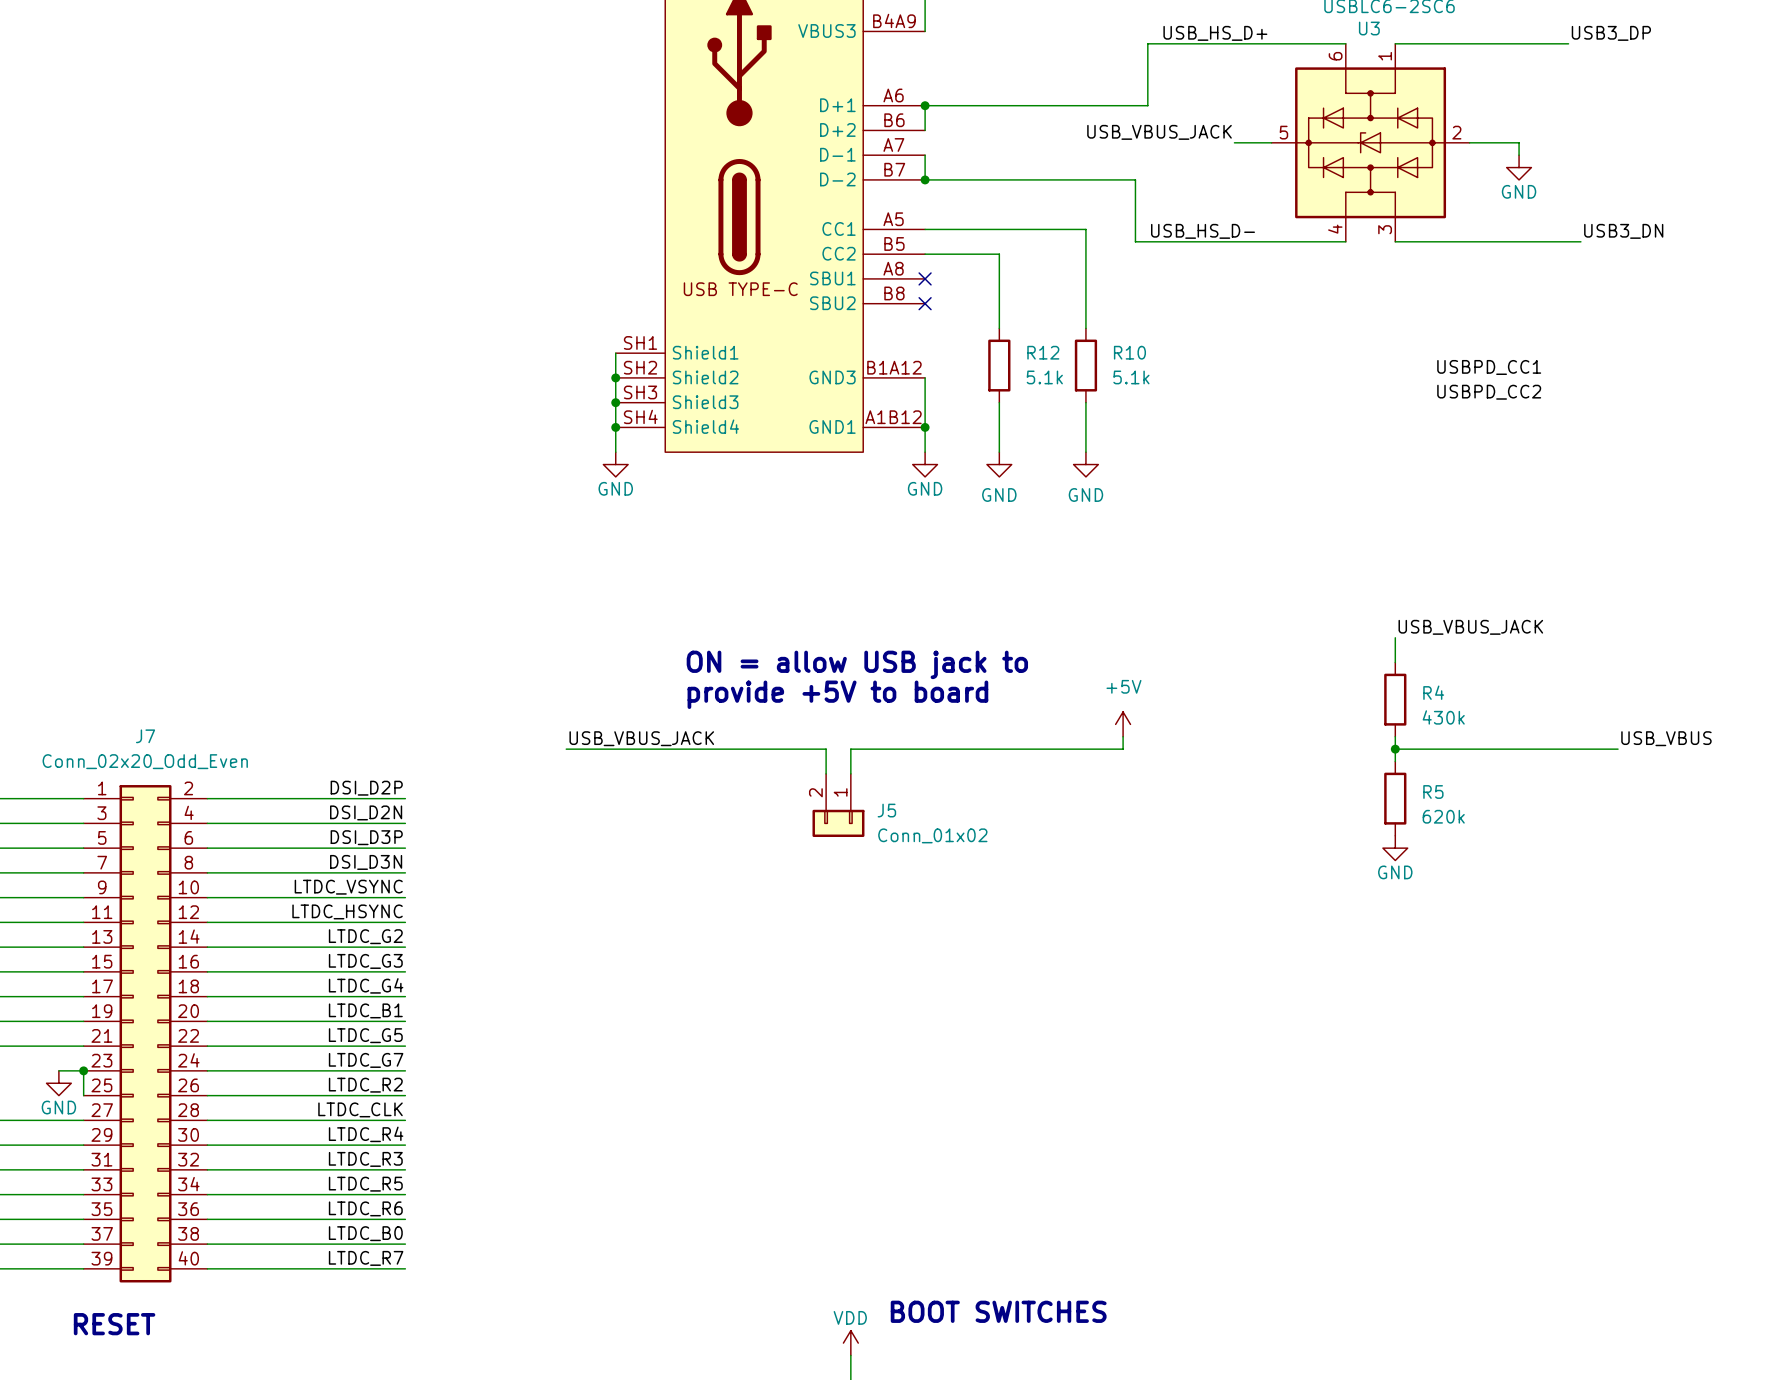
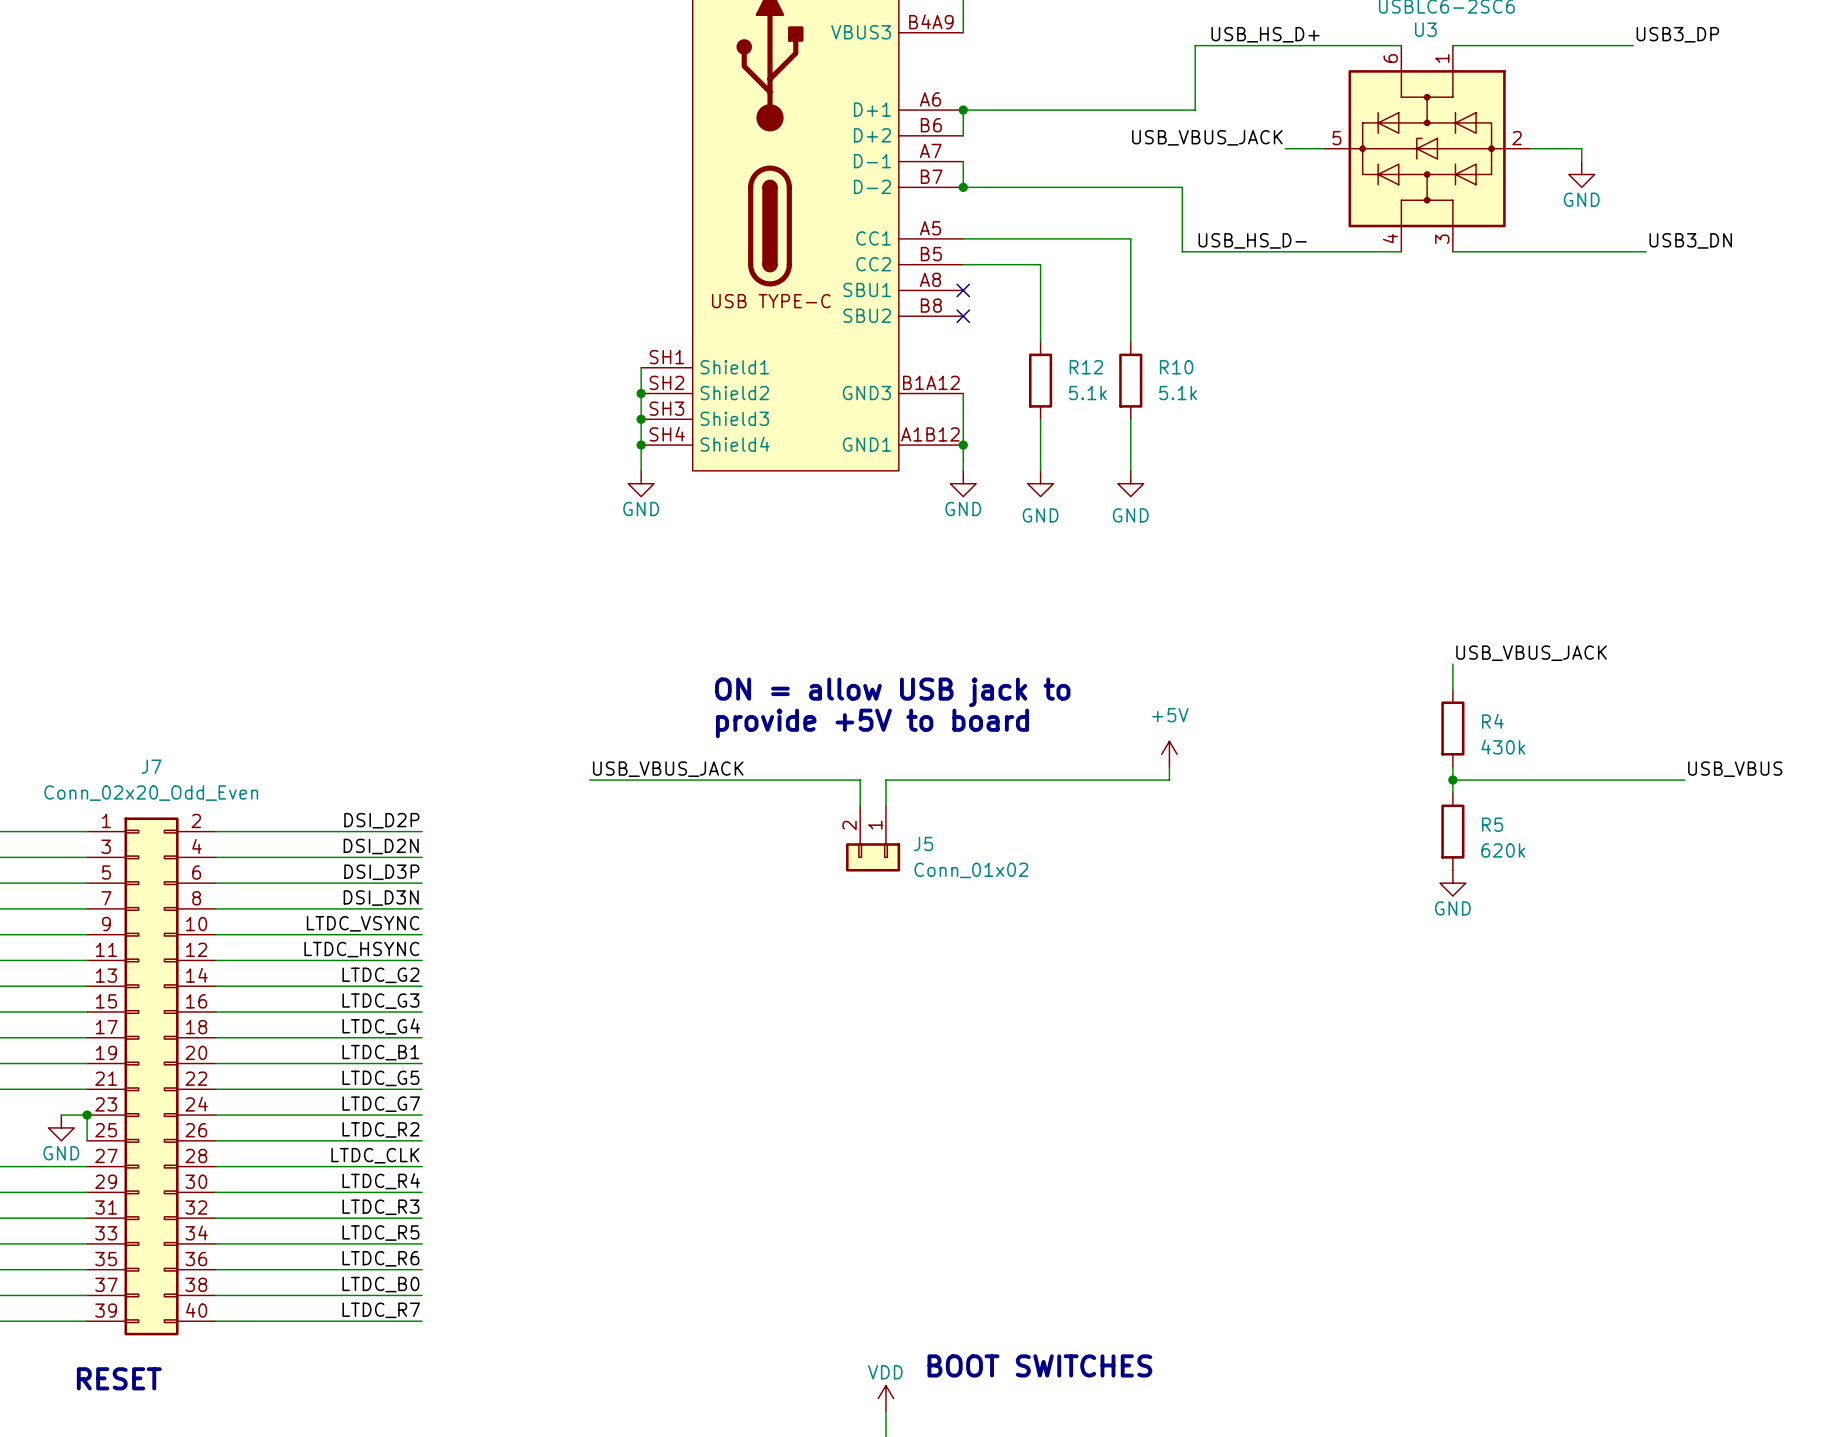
label: USBPD_CC1 (1489, 367) -> none
label: USBPD_CC2 (1489, 392) -> none

